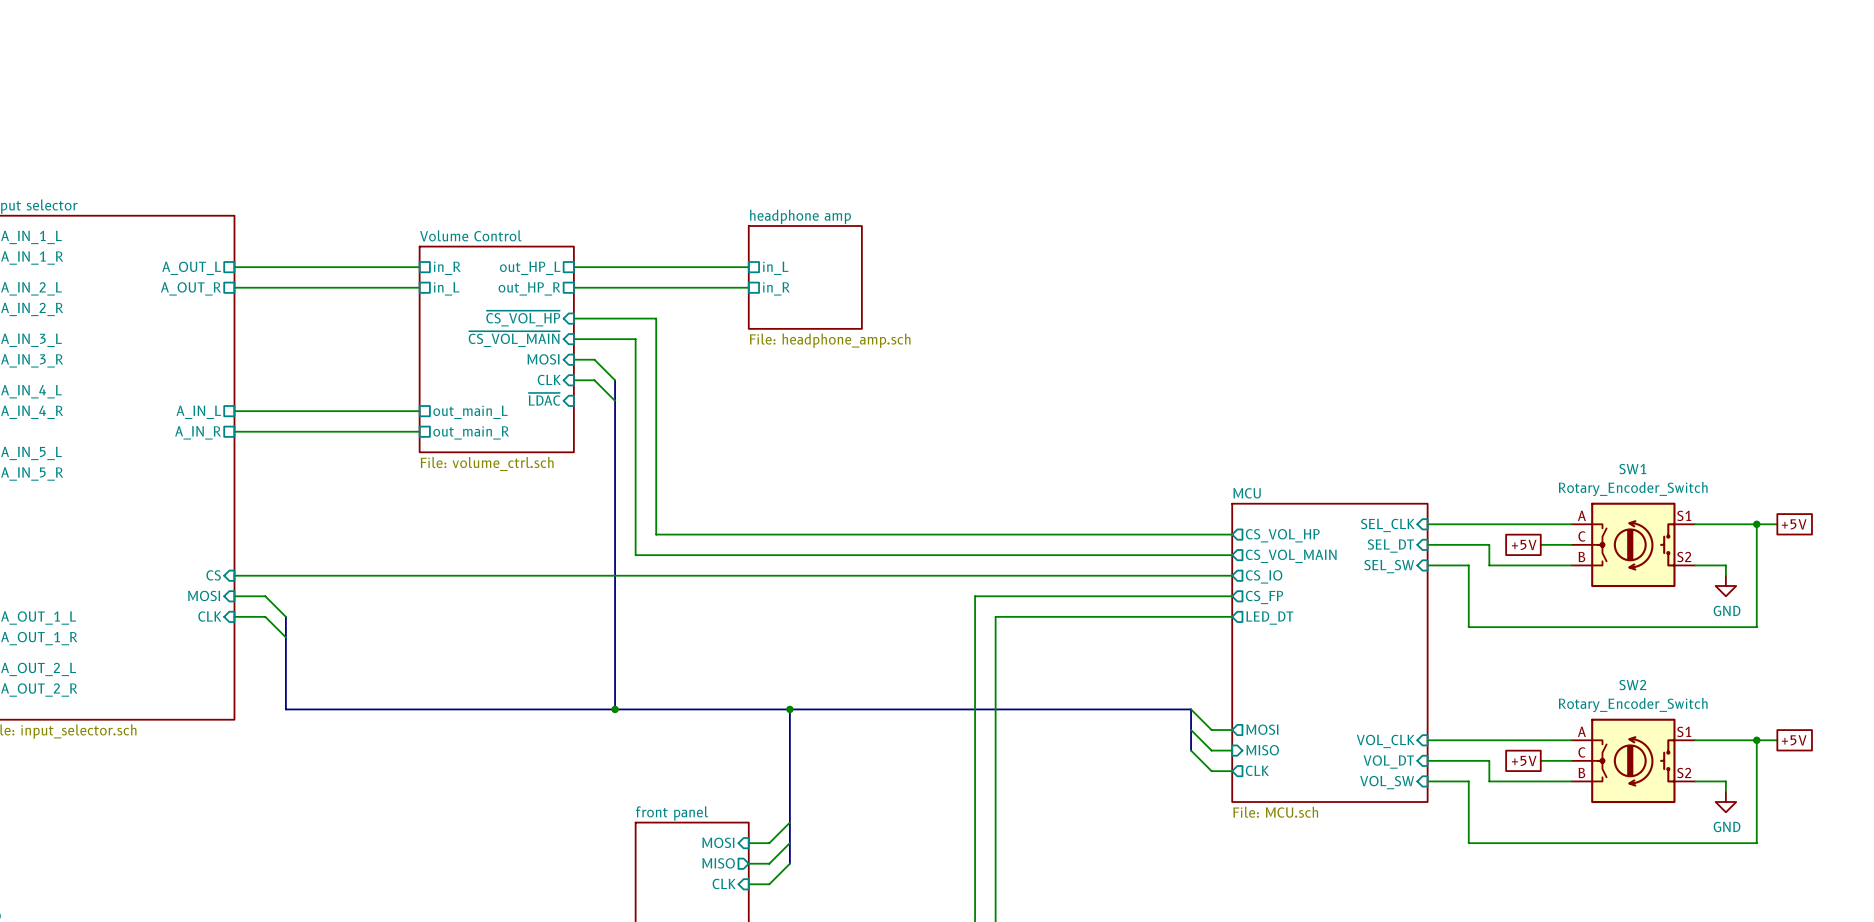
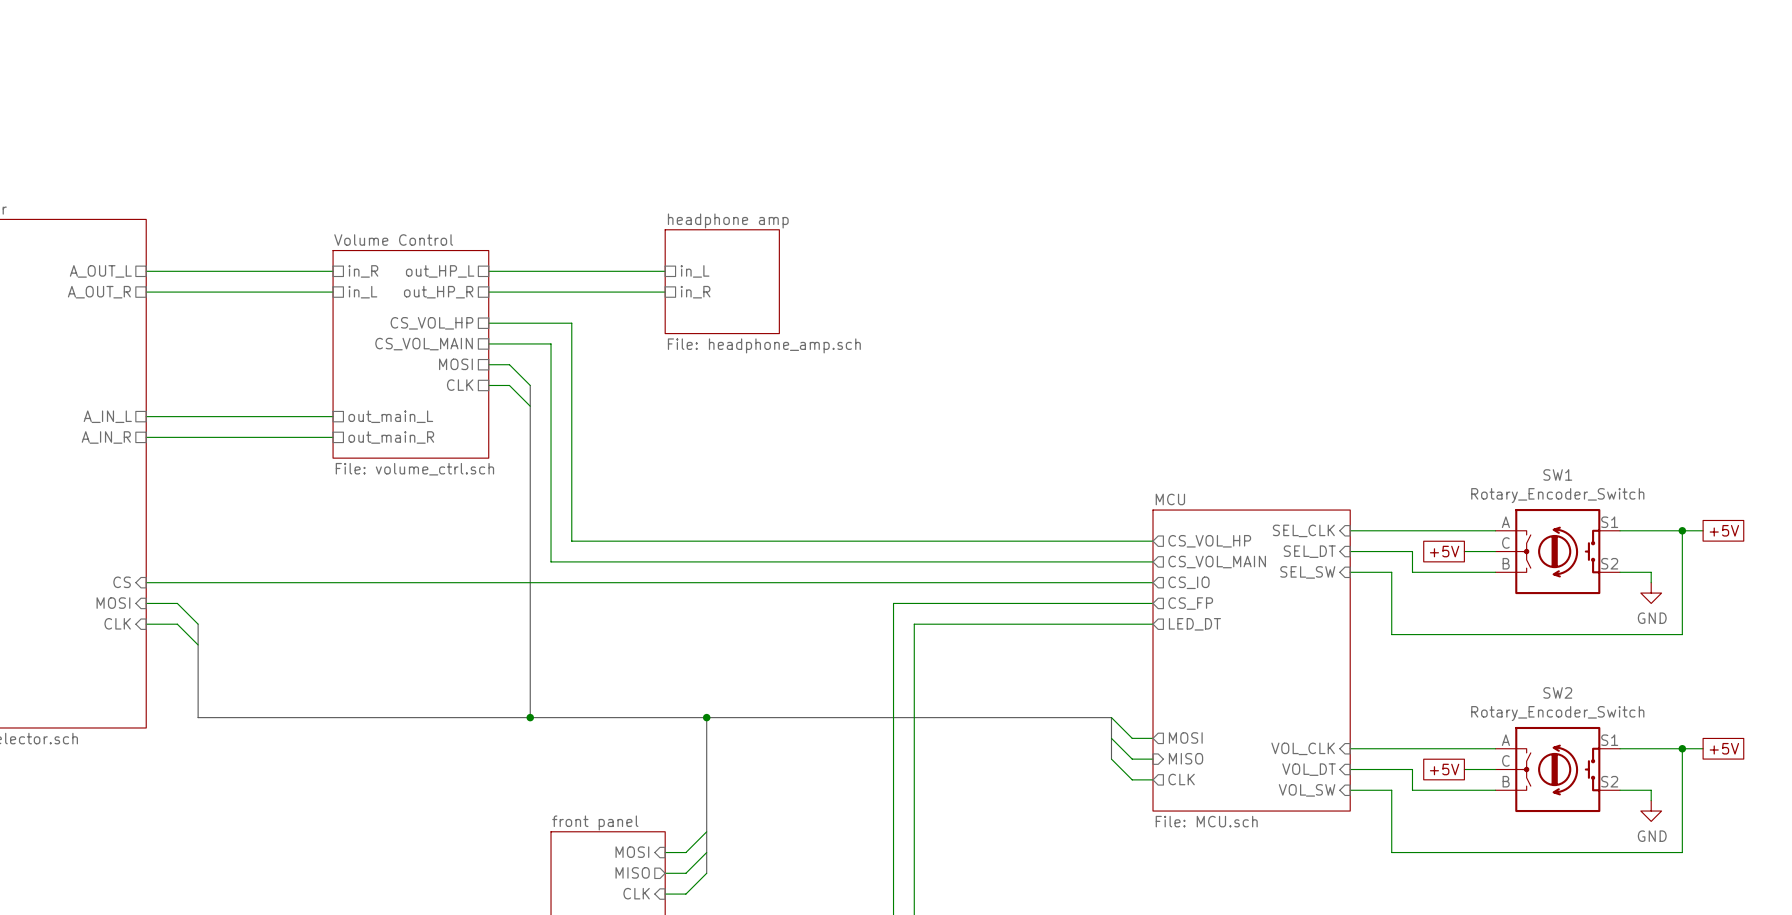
sheet pin shape: input (523, 318) -> passive (431, 323)
sheet pin: ~{CS_VOL_HP} (523, 318) -> CS_VOL_HP (431, 323)
sheet pin shape: input (514, 339) -> passive (424, 344)
sheet pin: ~{CS_VOL_MAIN} (514, 339) -> CS_VOL_MAIN (424, 344)
sheet pin shape: input (543, 359) -> passive (455, 364)
sheet pin shape: input (549, 379) -> passive (460, 385)
sheet pin: ~{LDAC} (544, 399) -> none

